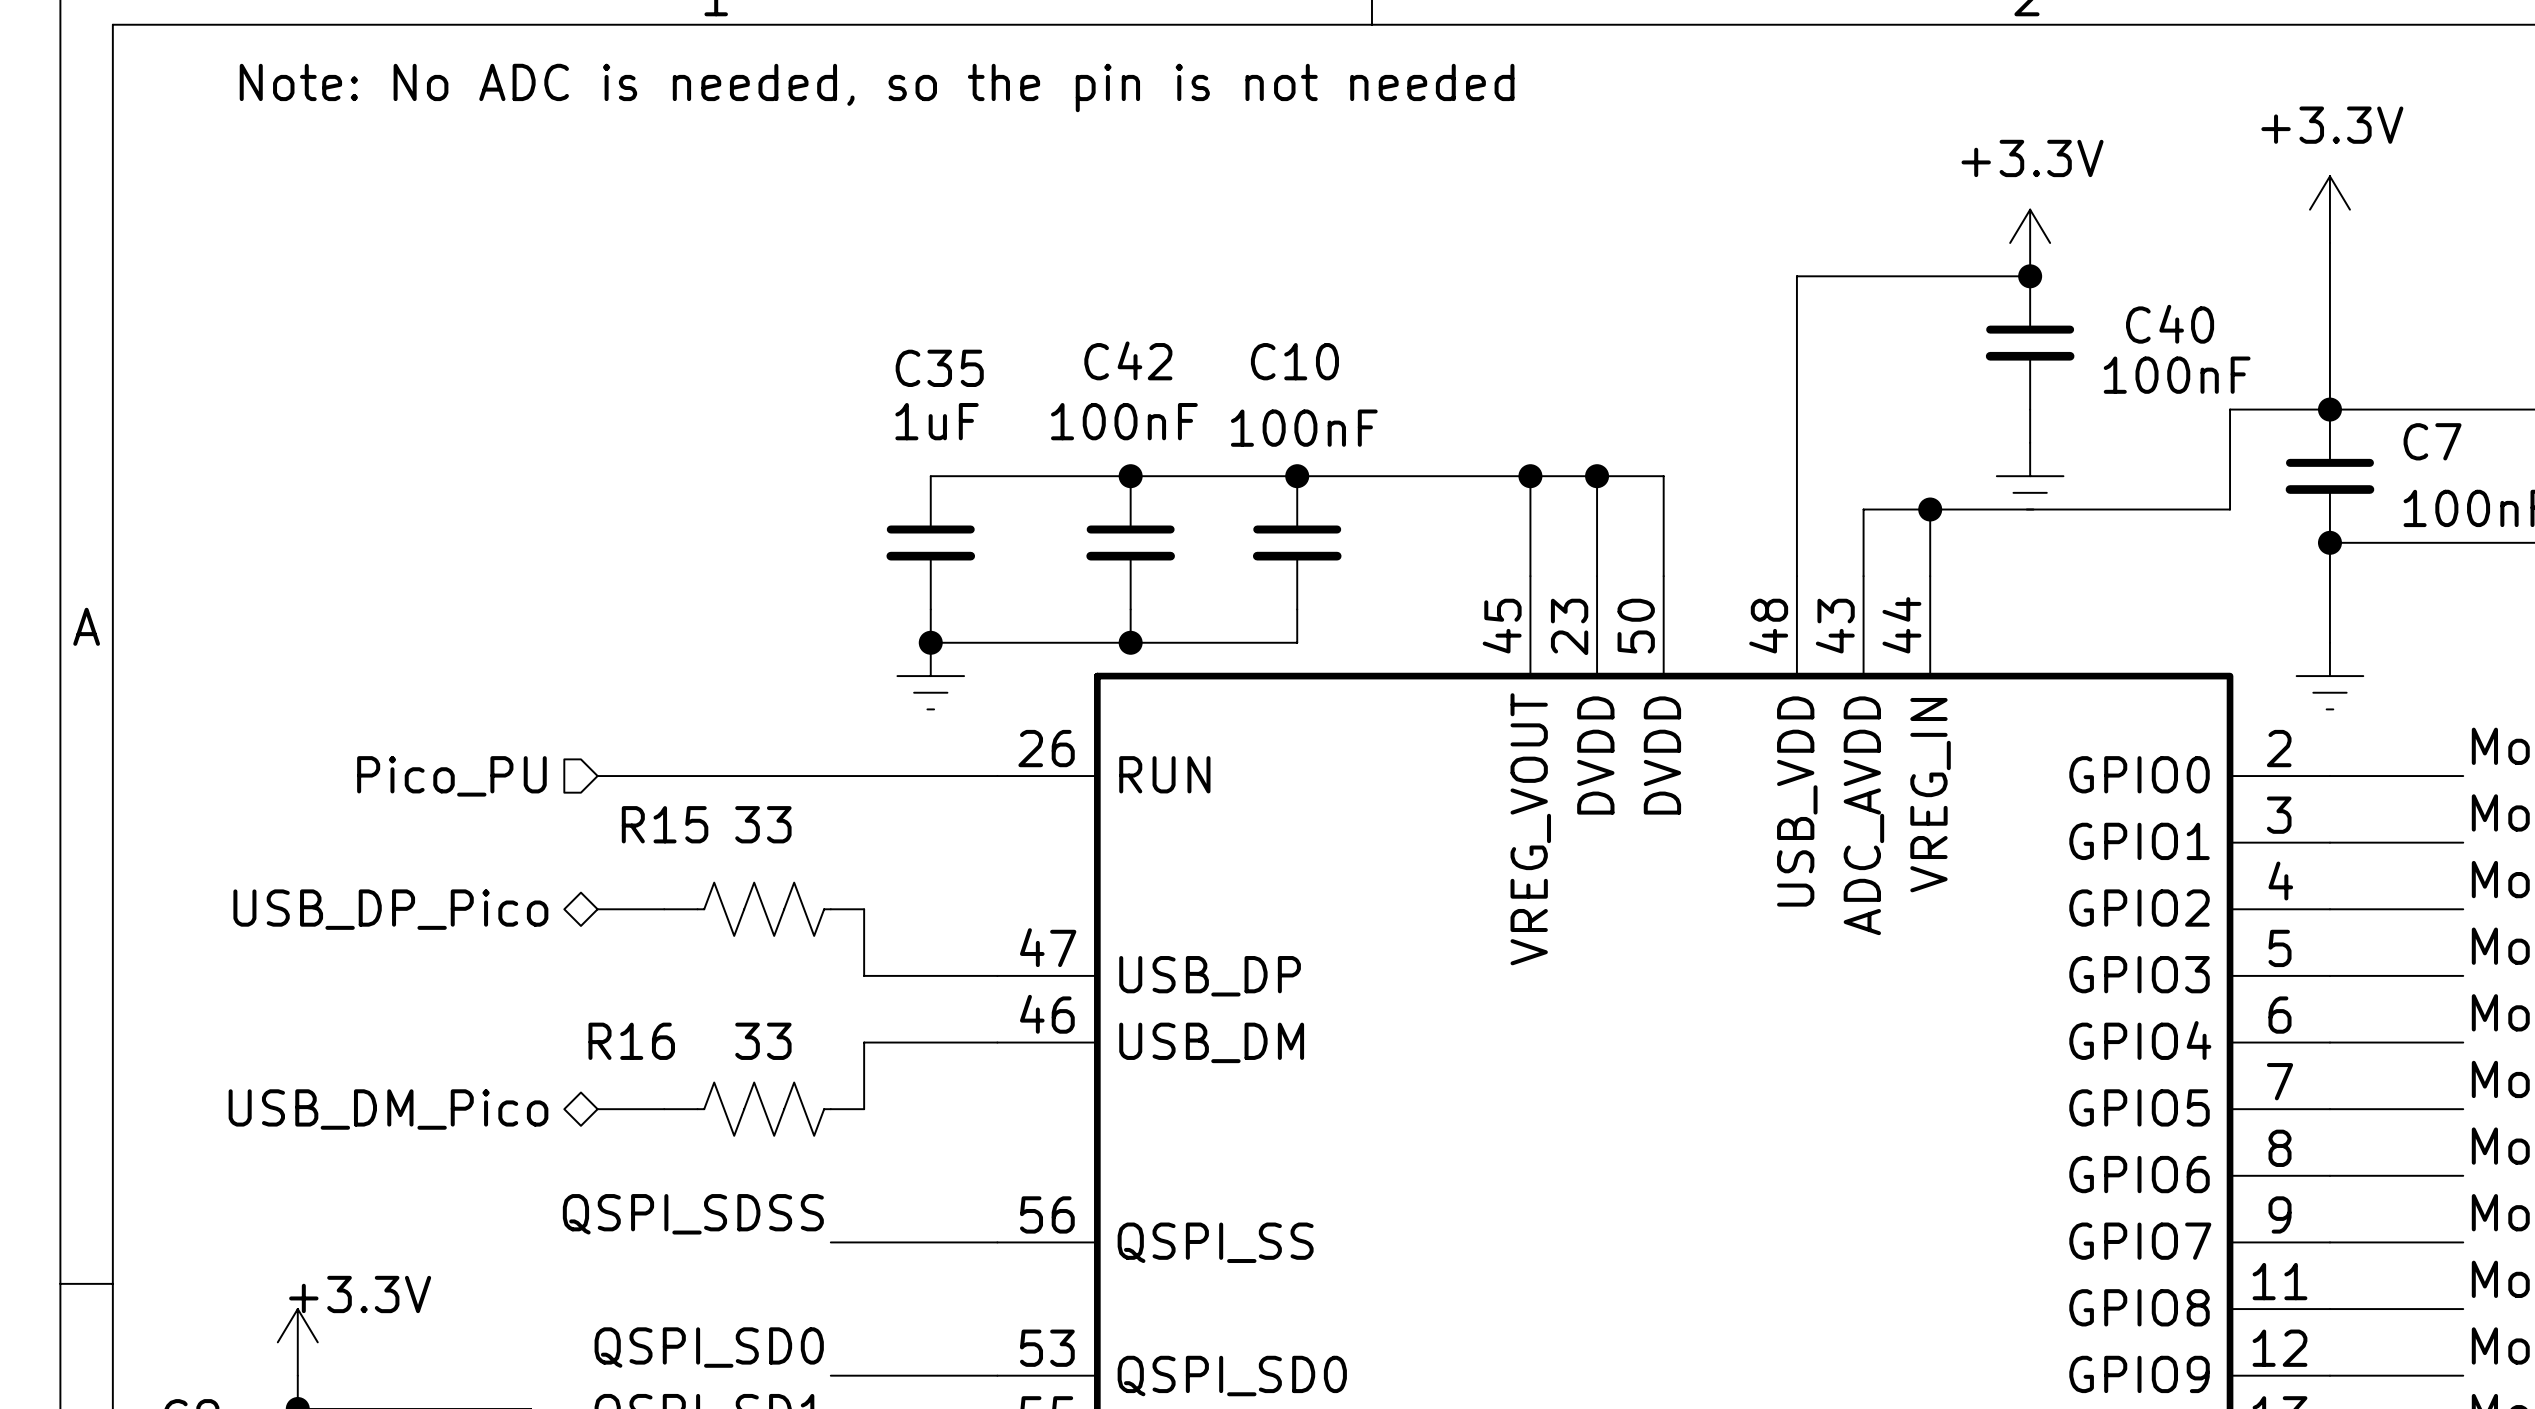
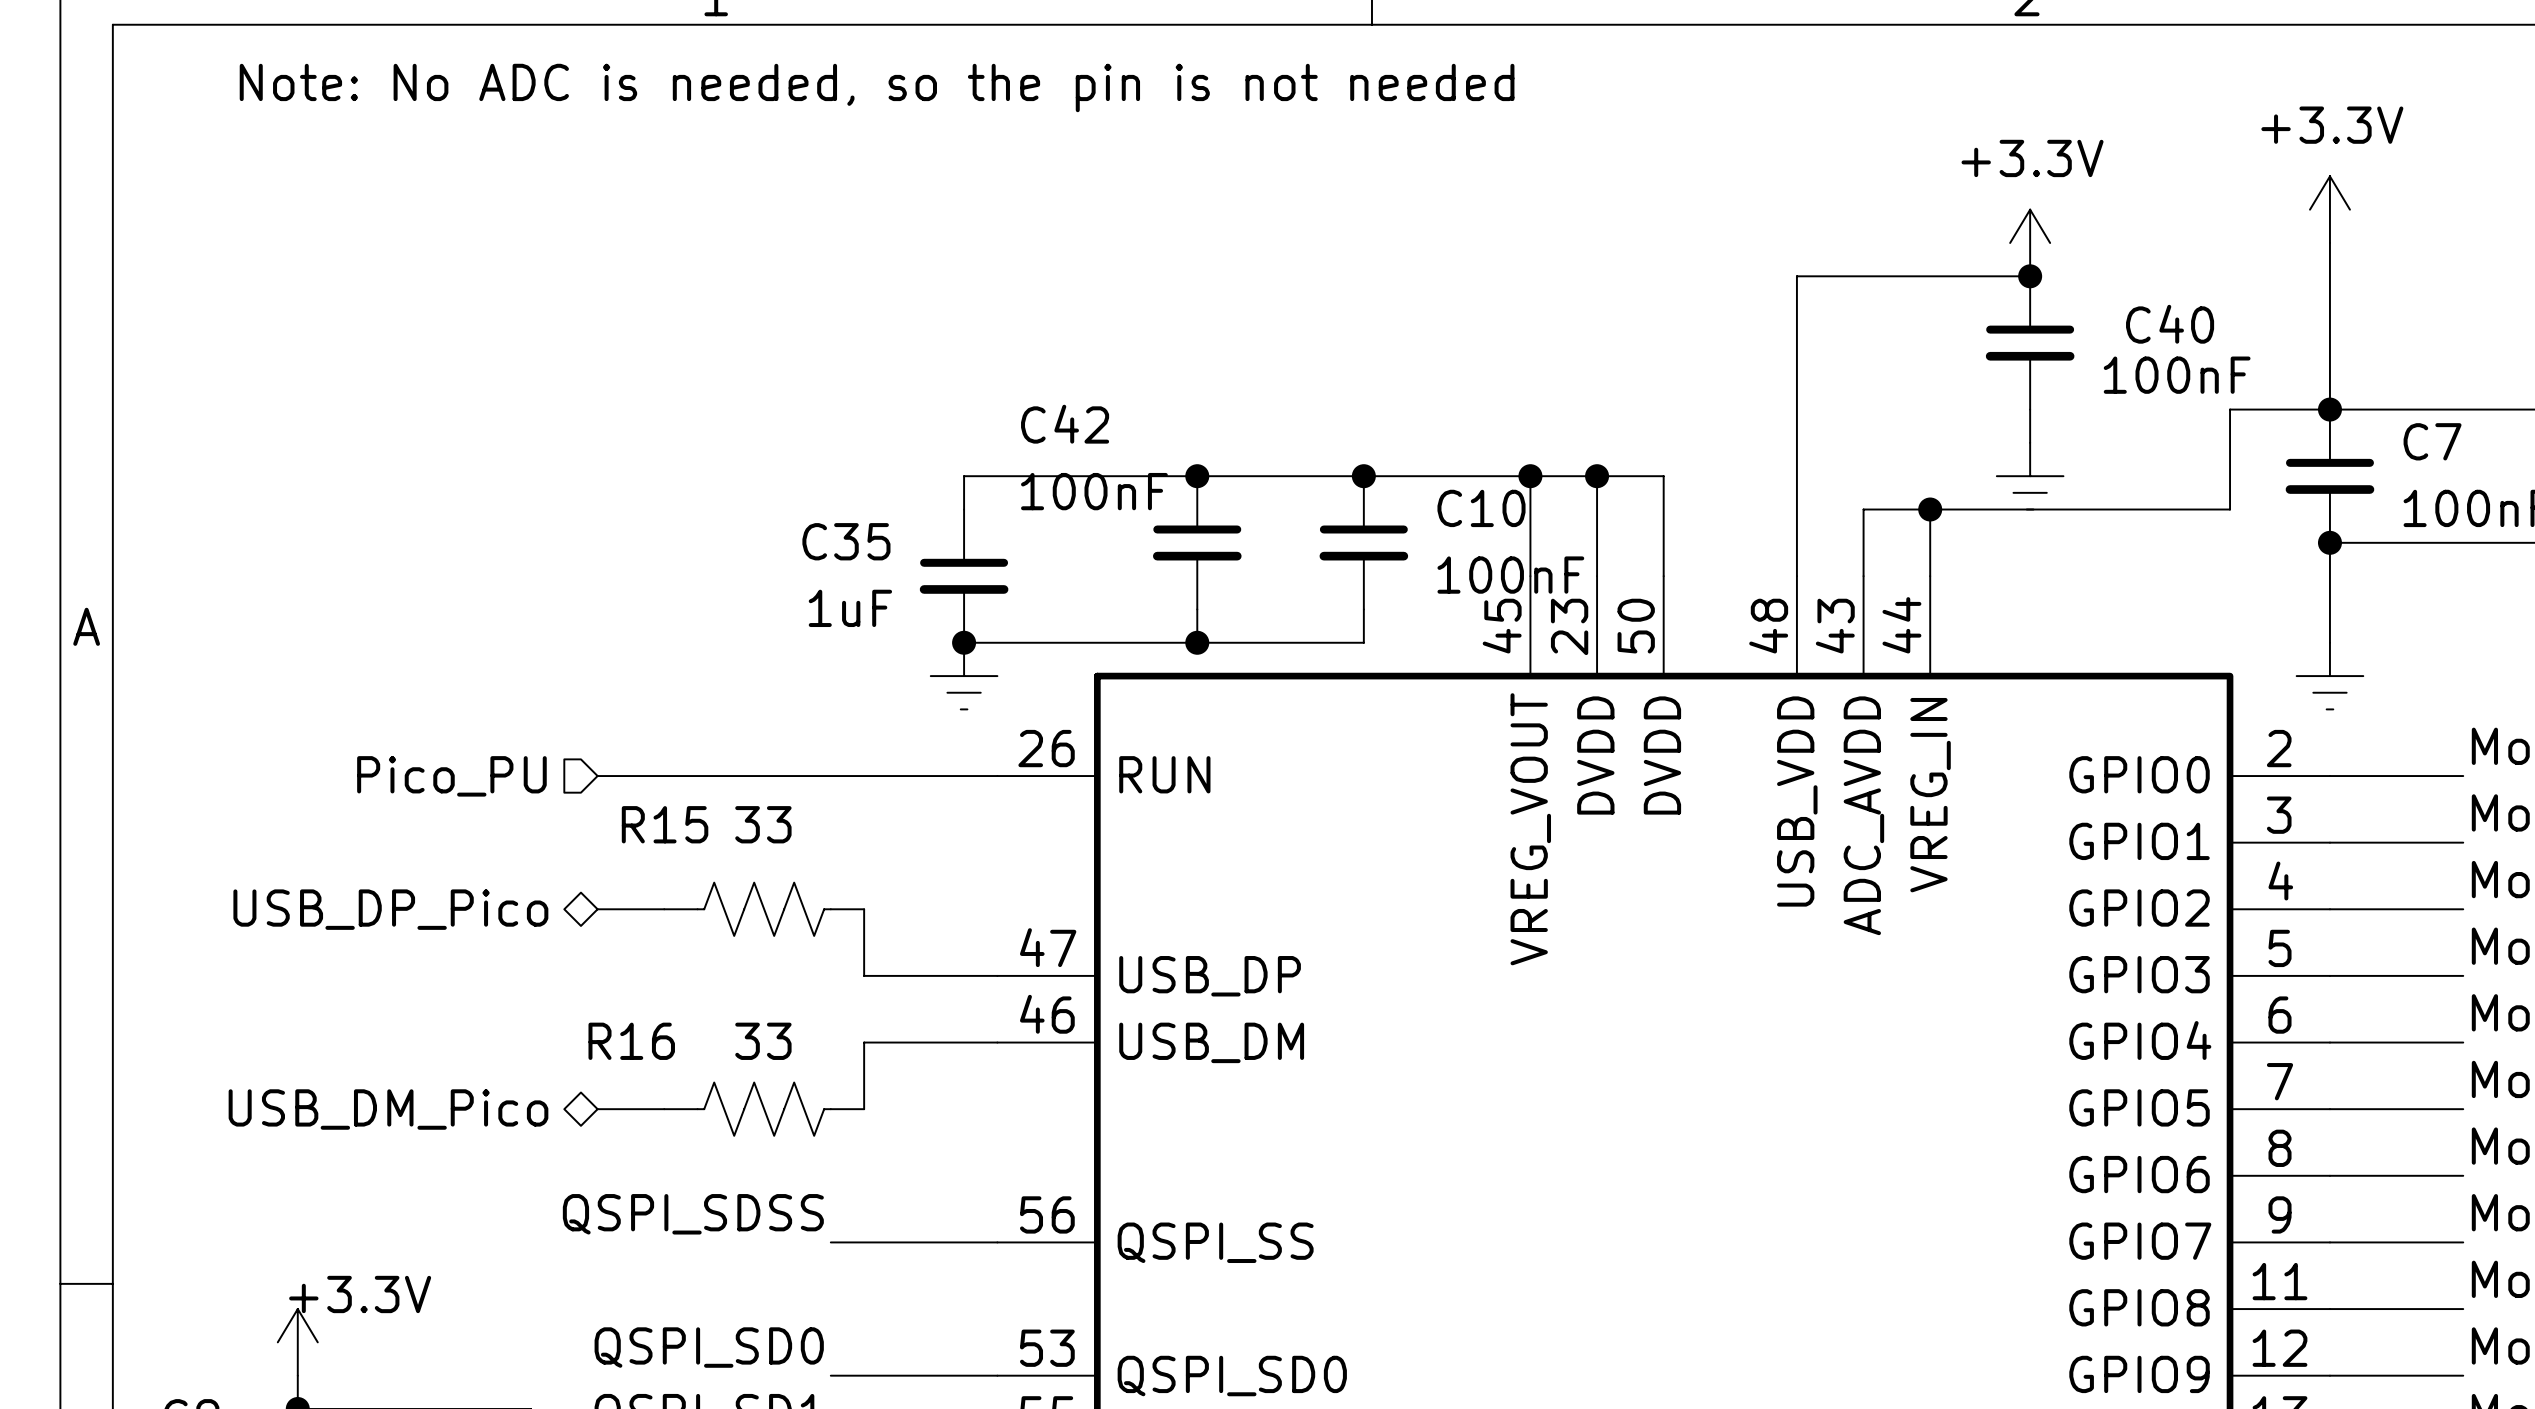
C42 name position: C42 (1128, 360) -> C42 (1065, 424)
C10 name position: C10 (1294, 361) -> C10 (1481, 508)
C35 name position: C35 (939, 368) -> C35 (846, 541)
C35 value position: 1uF (937, 421) -> 1uF (850, 608)
C42 value position: 100nF (1124, 421) -> 100nF (1094, 491)
C10 value position: 100nF (1304, 428) -> 100nF (1510, 575)
wire: (930, 476) (964, 476) -> (964, 509) (964, 476)
junction: (1130, 476) -> none
junction: none -> (1197, 476)
junction: (1297, 476) -> none
junction: none -> (1363, 476)
C35 position: (930, 542) -> (964, 576)
C42 position: (1130, 542) -> (1197, 542)
C10 position: (1297, 542) -> (1363, 542)
wire: (930, 609) (930, 642) (964, 642) -> none
wire: (1130, 609) (1130, 642) -> (1197, 609) (1197, 642)
wire: (1297, 609) (1297, 642) -> (1363, 609) (1363, 642) (1297, 642)
junction position: (930, 642) -> (964, 642)
junction position: (1130, 642) -> (1197, 642)
power symbol position: (930, 676) -> (964, 676)

